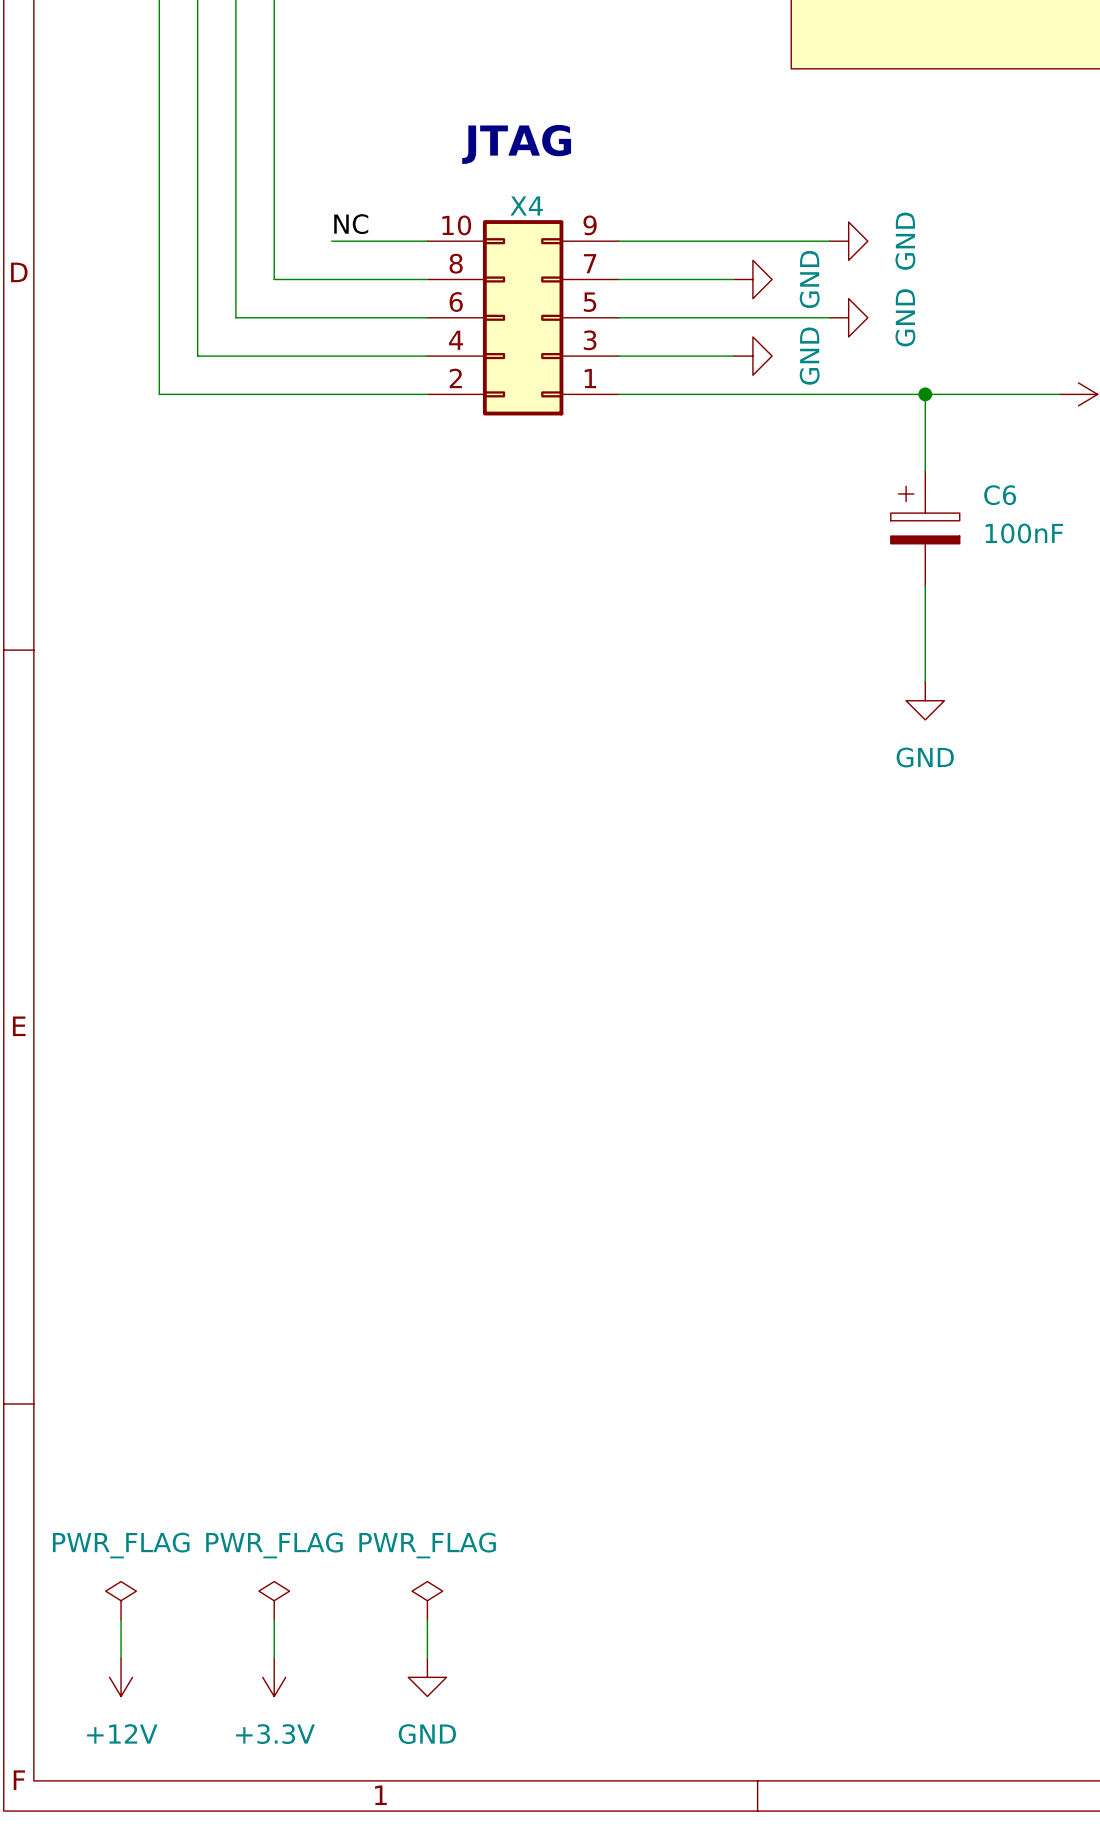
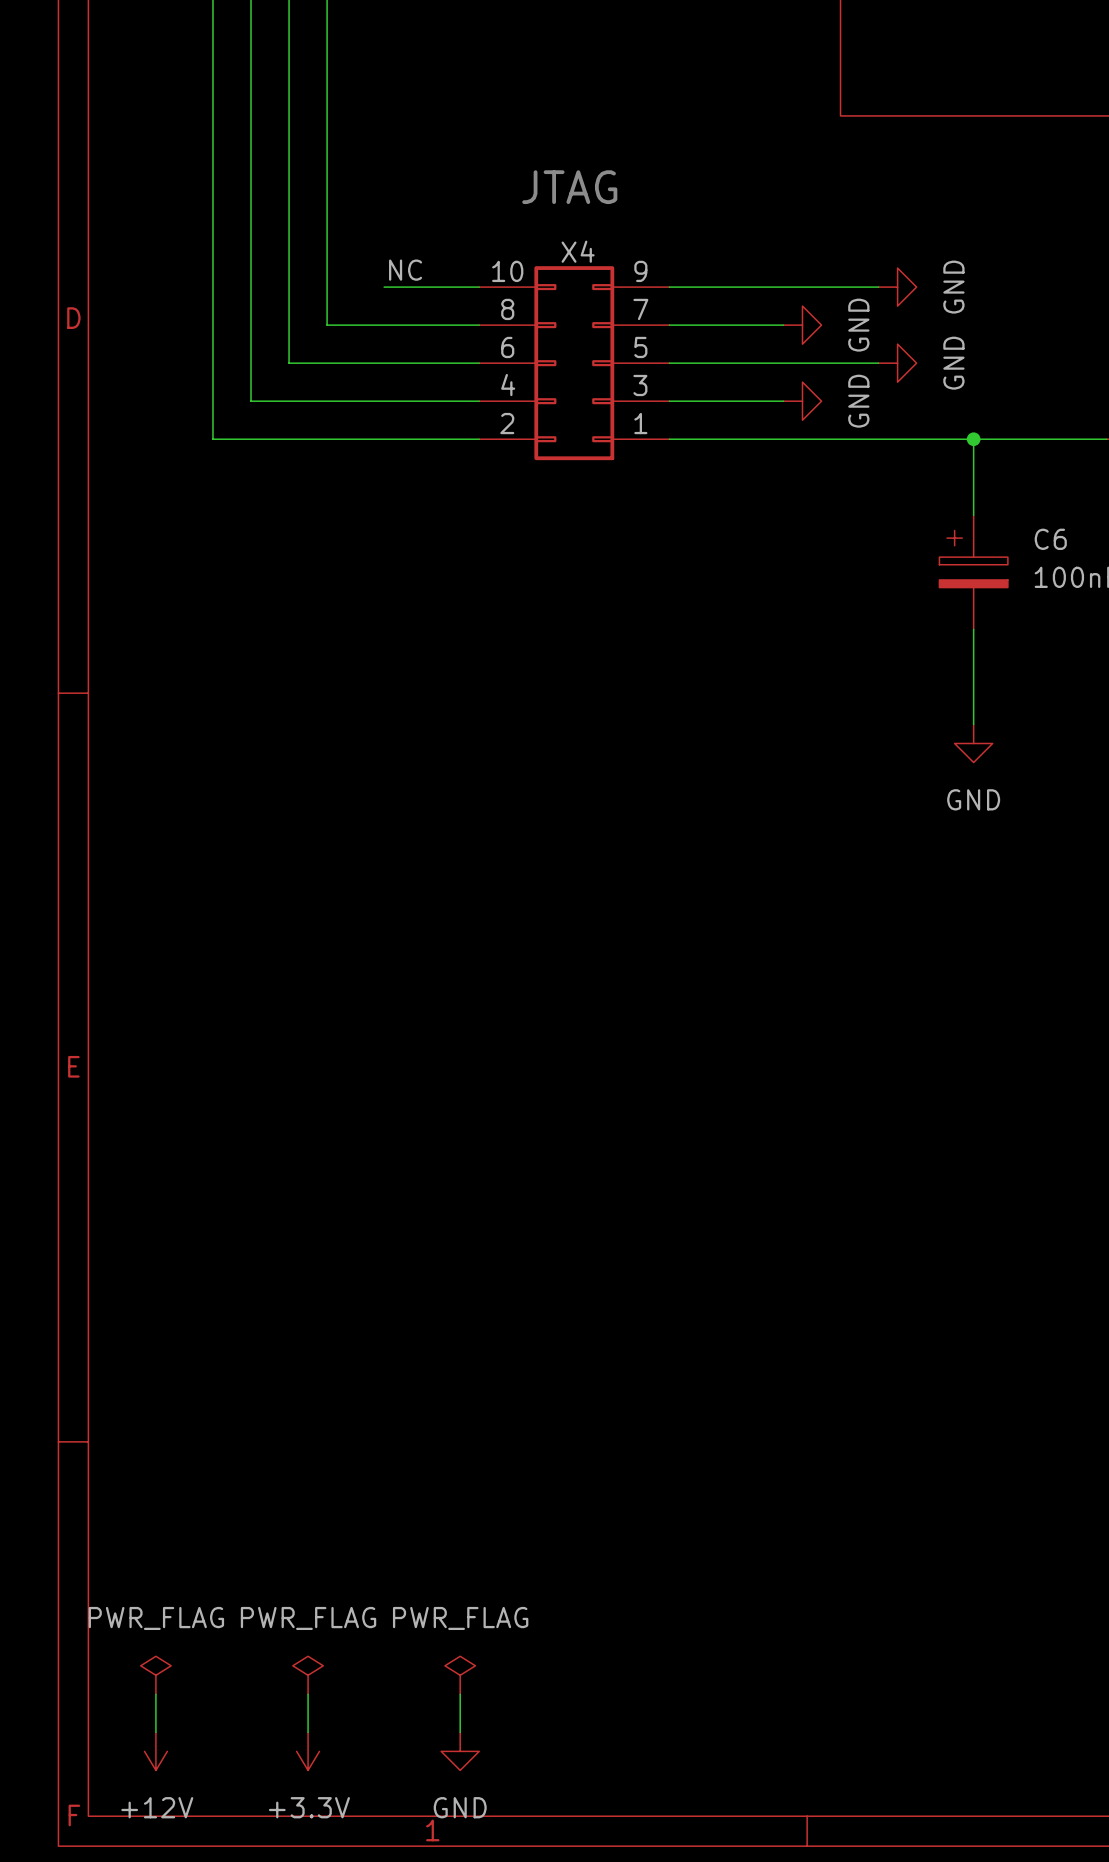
power symbol position: PWR_FLAG (121, 1600) -> PWR_FLAG (155, 1675)
power symbol position: PWR_FLAG (274, 1600) -> PWR_FLAG (308, 1675)
power symbol position: PWR_FLAG (427, 1600) -> PWR_FLAG (460, 1675)
wire: (121, 1619) (121, 1658) -> (155, 1694) (155, 1732)
wire: (274, 1619) (274, 1658) -> (308, 1694) (308, 1732)
wire: (427, 1619) (427, 1658) -> (460, 1694) (460, 1732)
power symbol position: +12V (121, 1677) -> +12V (155, 1751)
power symbol position: +3.3V (274, 1677) -> +3.3V (308, 1751)
power symbol position: GND (427, 1677) -> GND (460, 1751)

